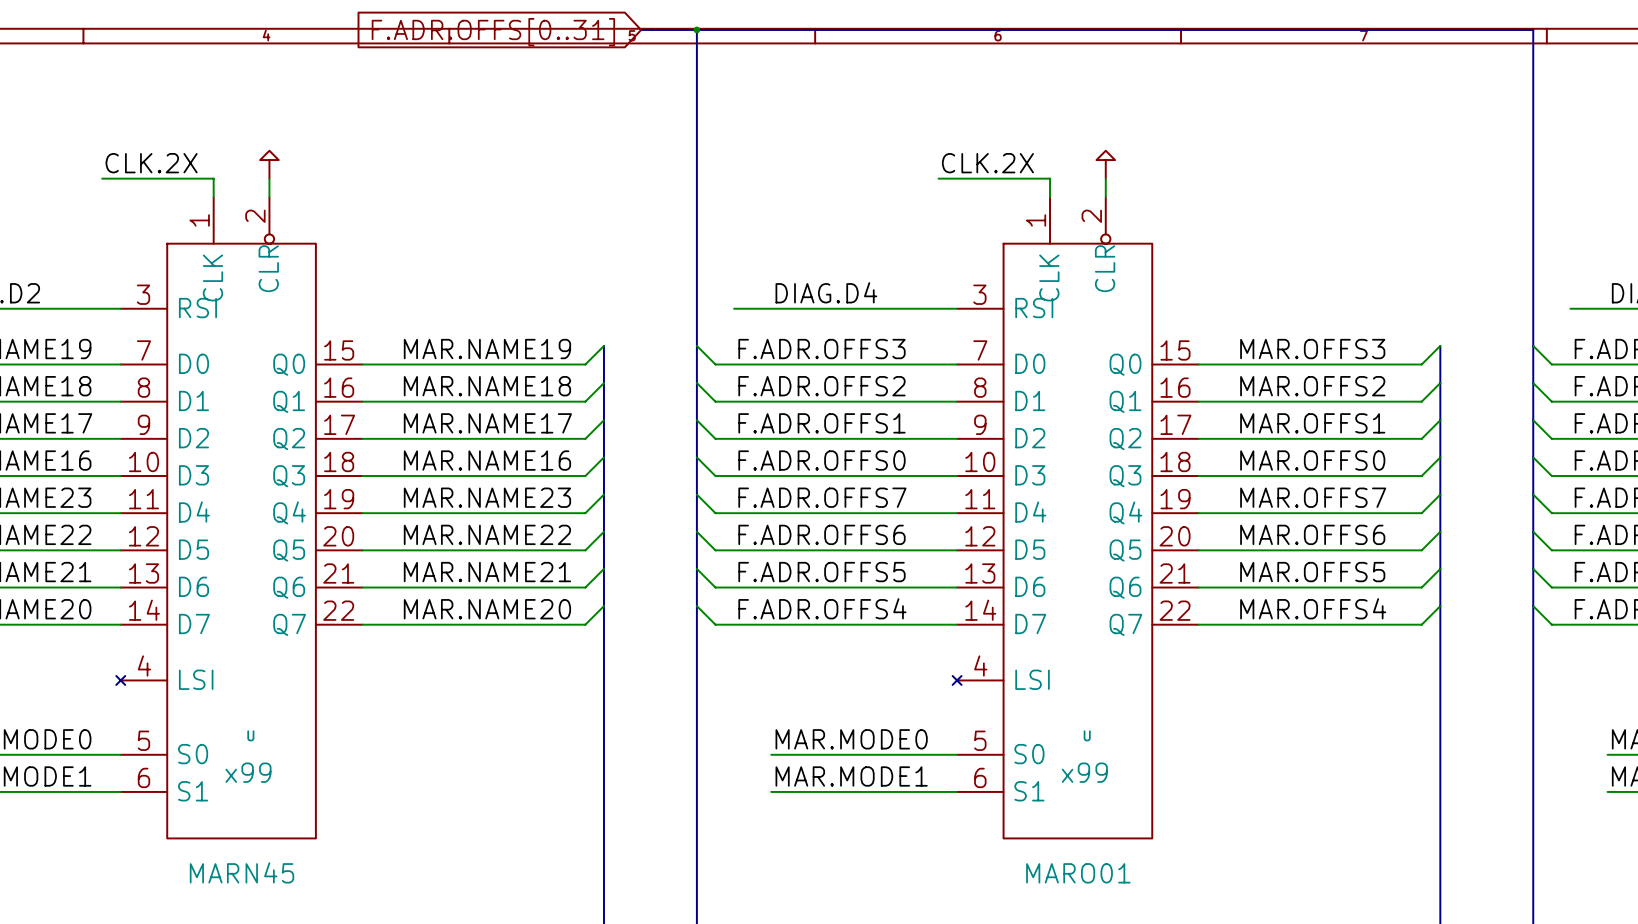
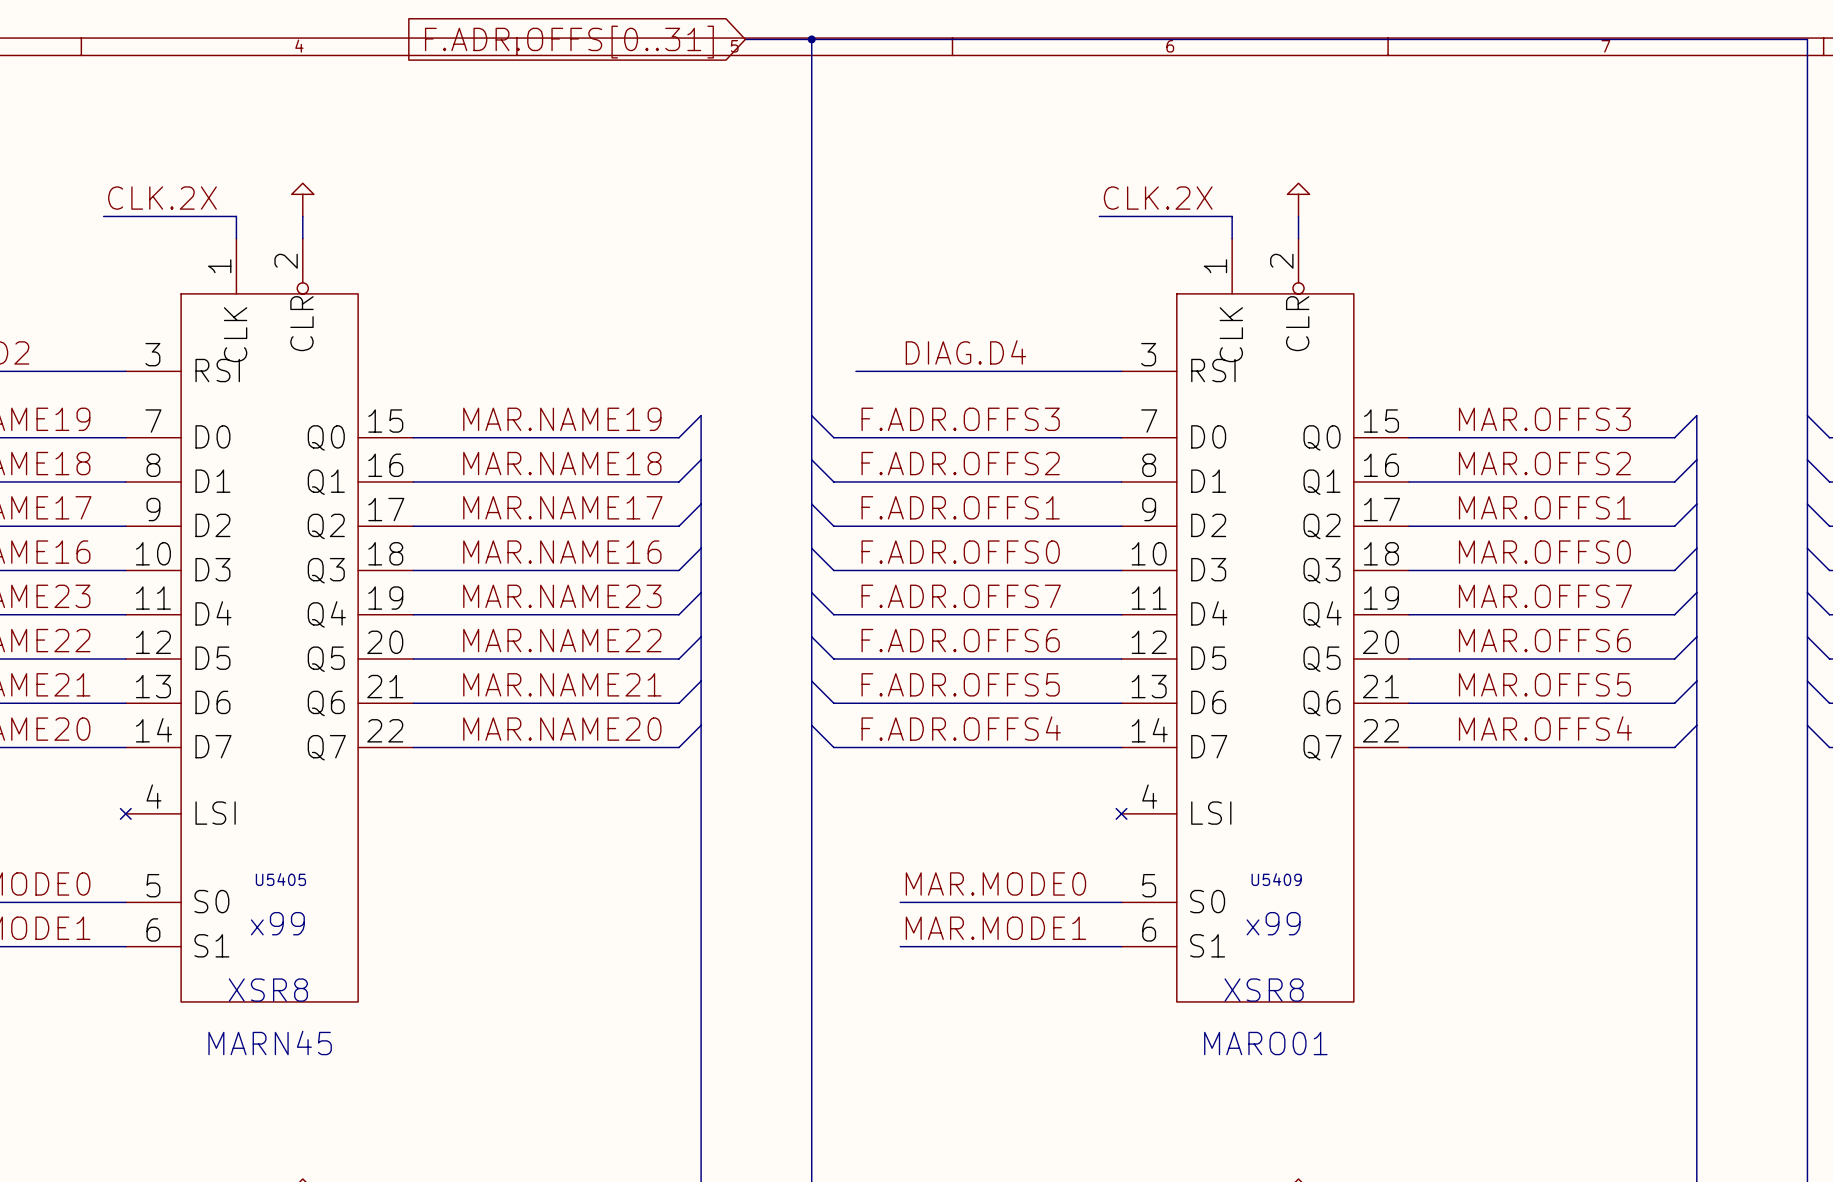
U name: U (250, 735) -> U5405 (280, 879)
U name: U (1087, 735) -> U5409 (1276, 879)
U value: none -> XSR8 (268, 990)
U value: none -> XSR8 (1264, 990)

